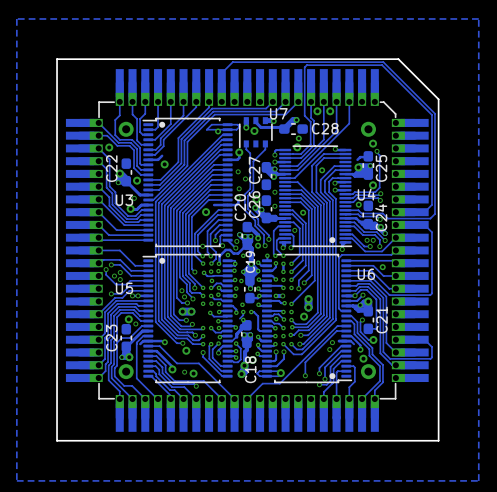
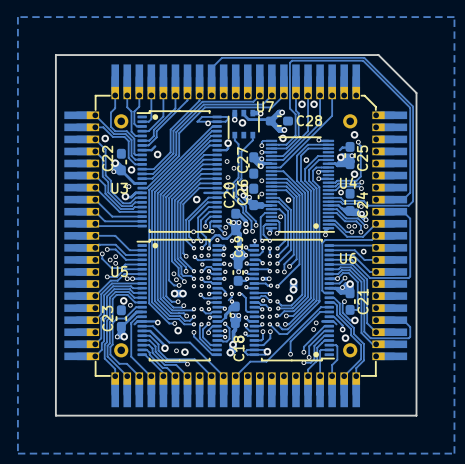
track: none -> (270, 121) (279, 130) (284, 130)
via: (291, 312) -> none

